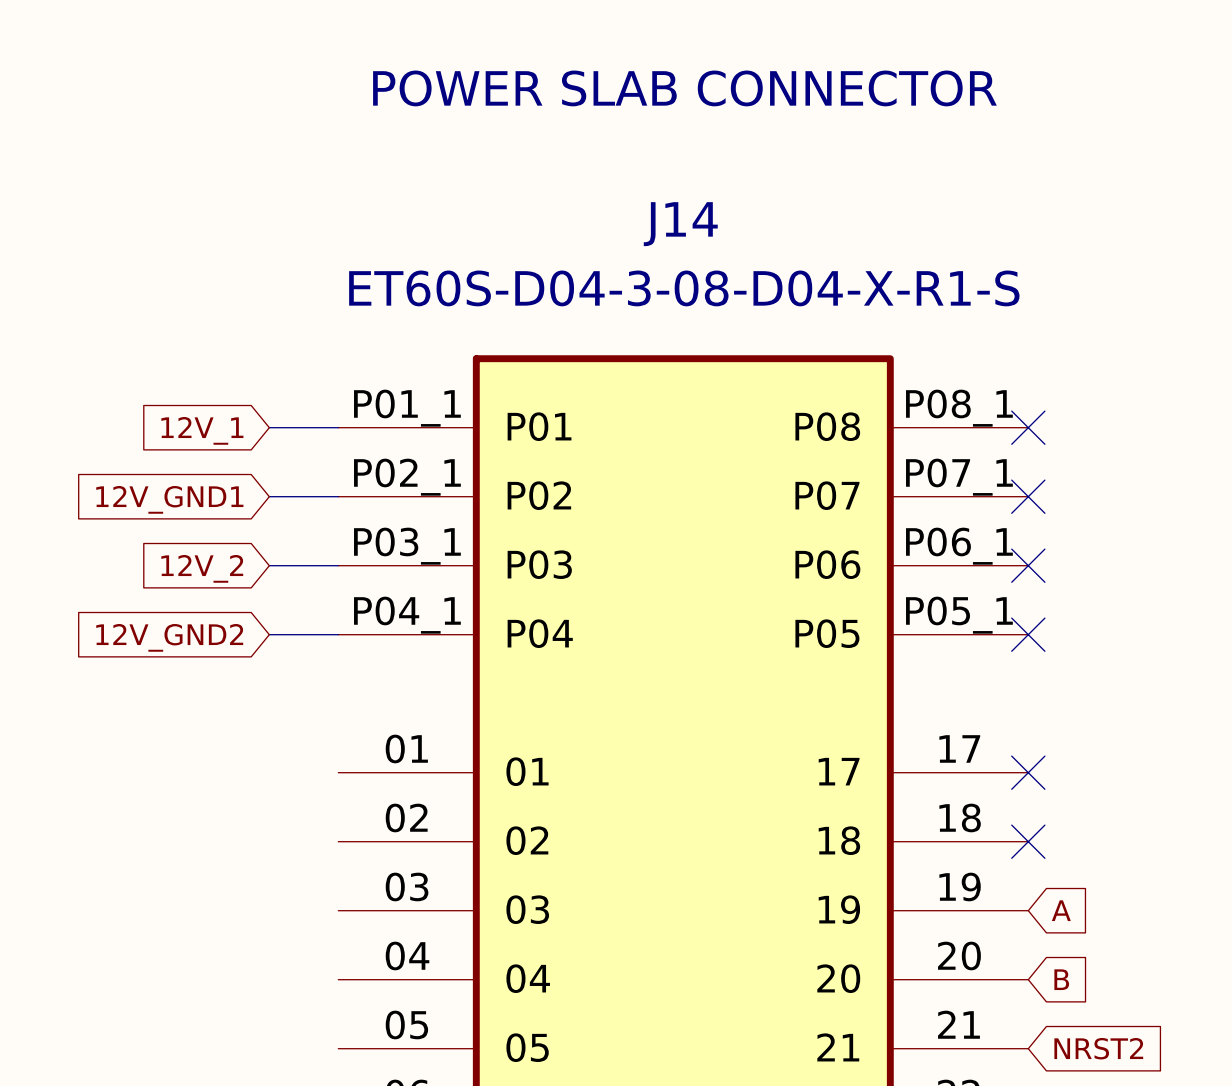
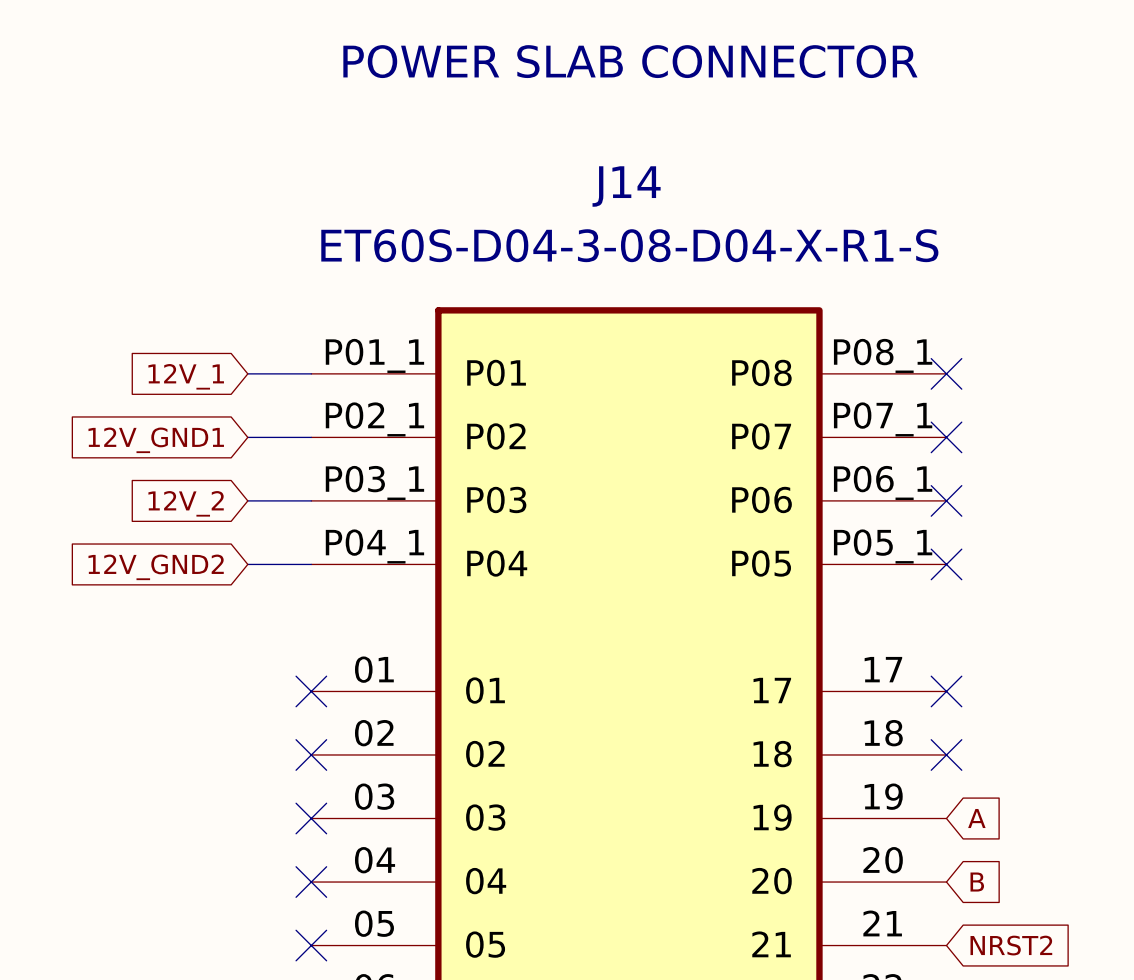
no-connect mark: none -> (311, 691)
no-connect mark: none -> (311, 754)
no-connect mark: none -> (311, 818)
no-connect mark: none -> (311, 882)
no-connect mark: none -> (311, 945)

